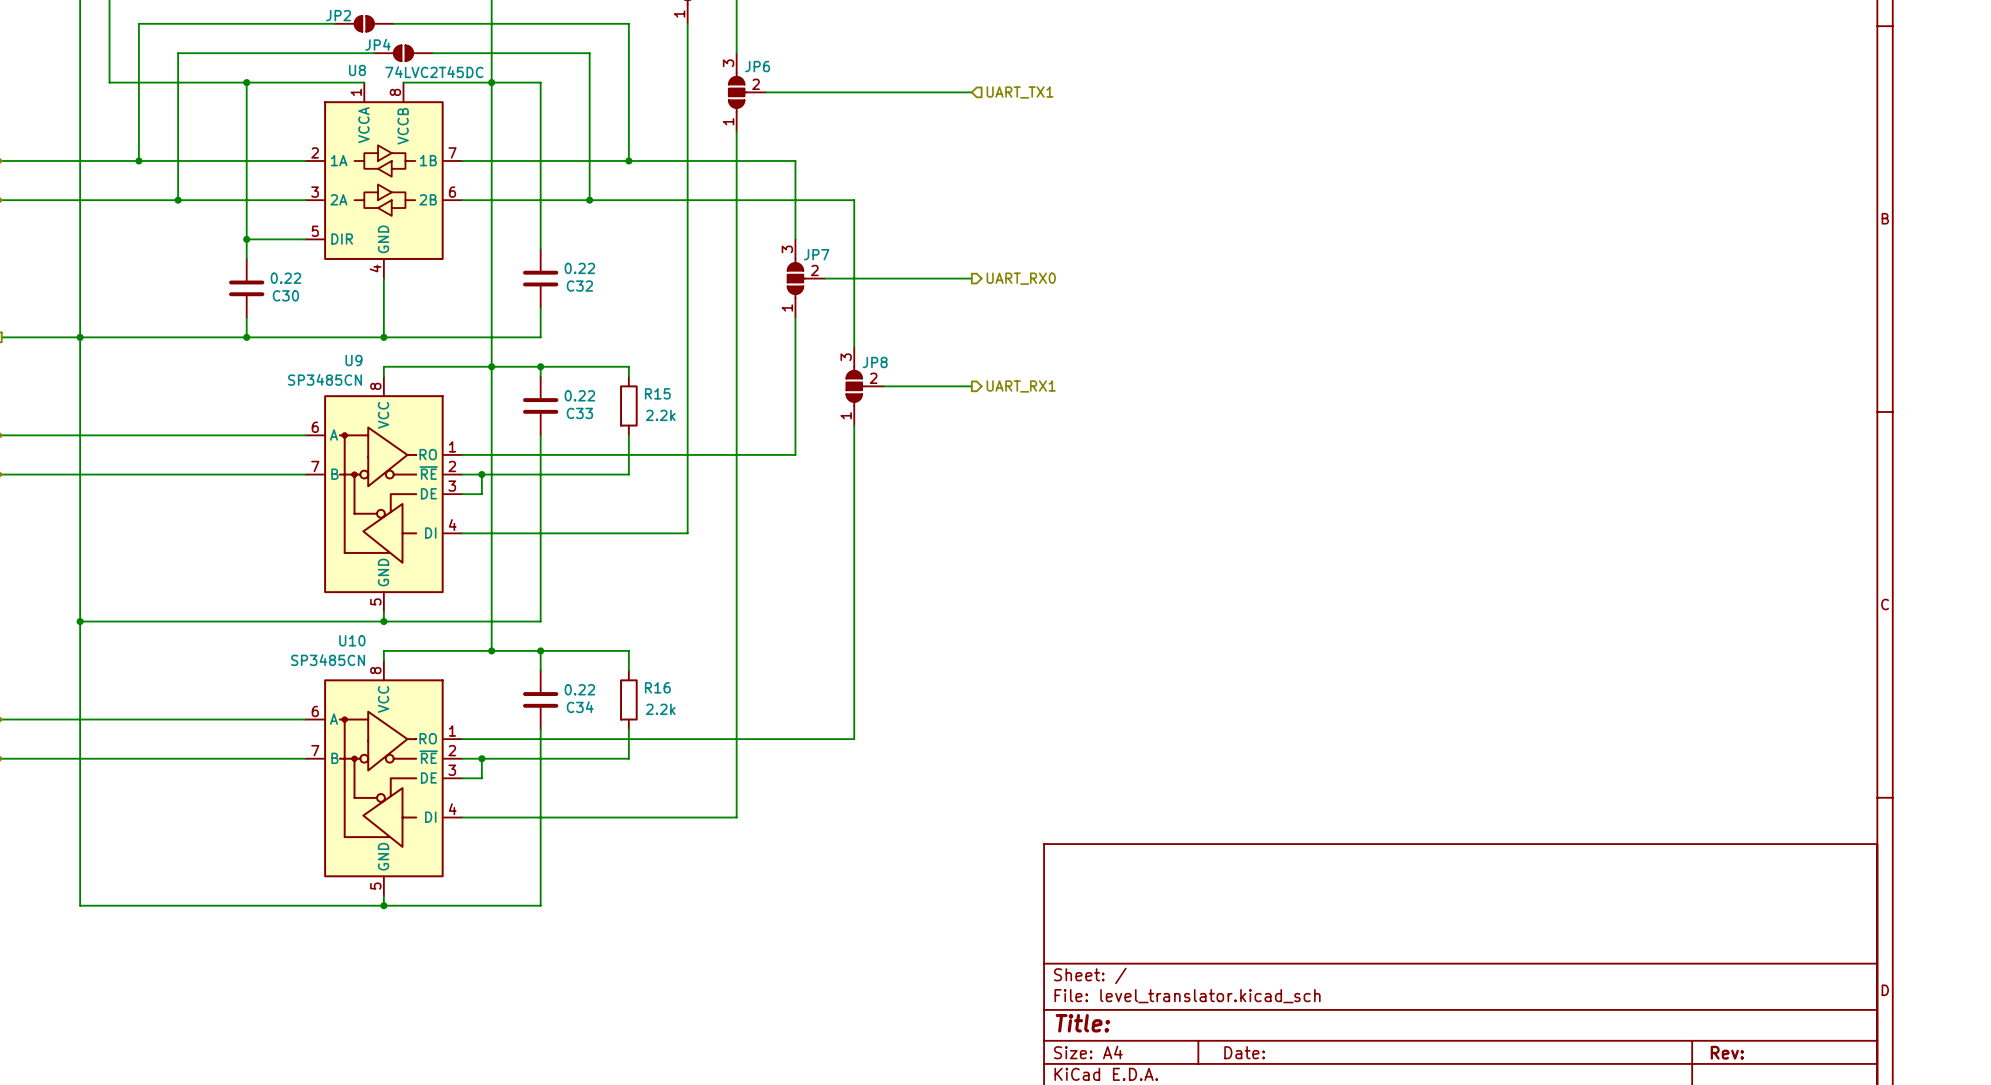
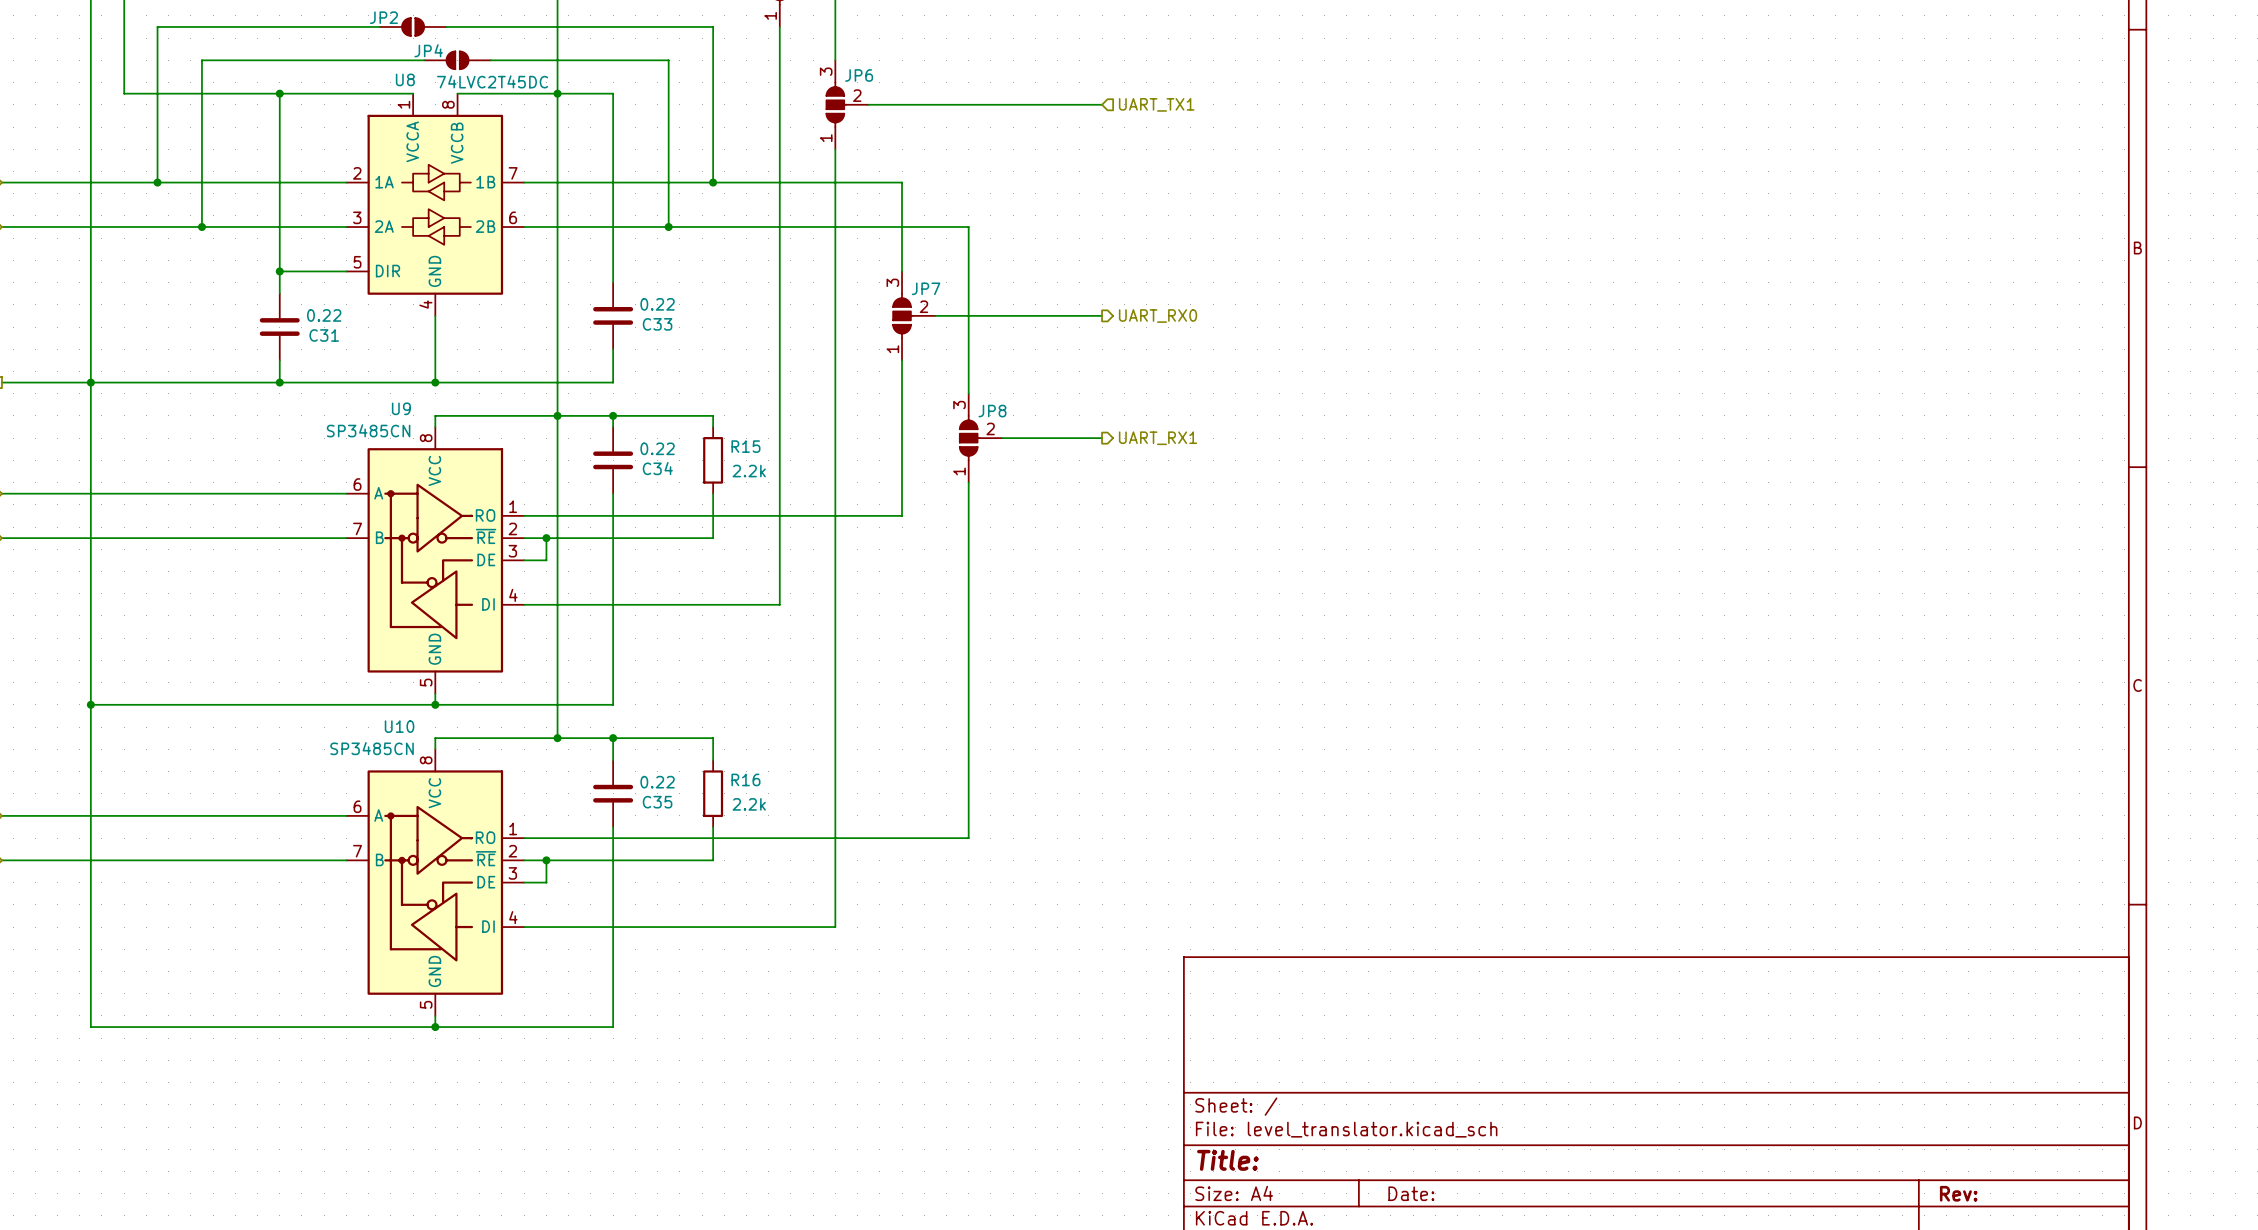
C32 name: C32 (579, 286) -> C33 (657, 324)
C30 name: C30 (285, 295) -> C31 (324, 335)
C33 name: C33 (579, 413) -> C34 (657, 468)
C34 name: C34 (580, 707) -> C35 (657, 802)

